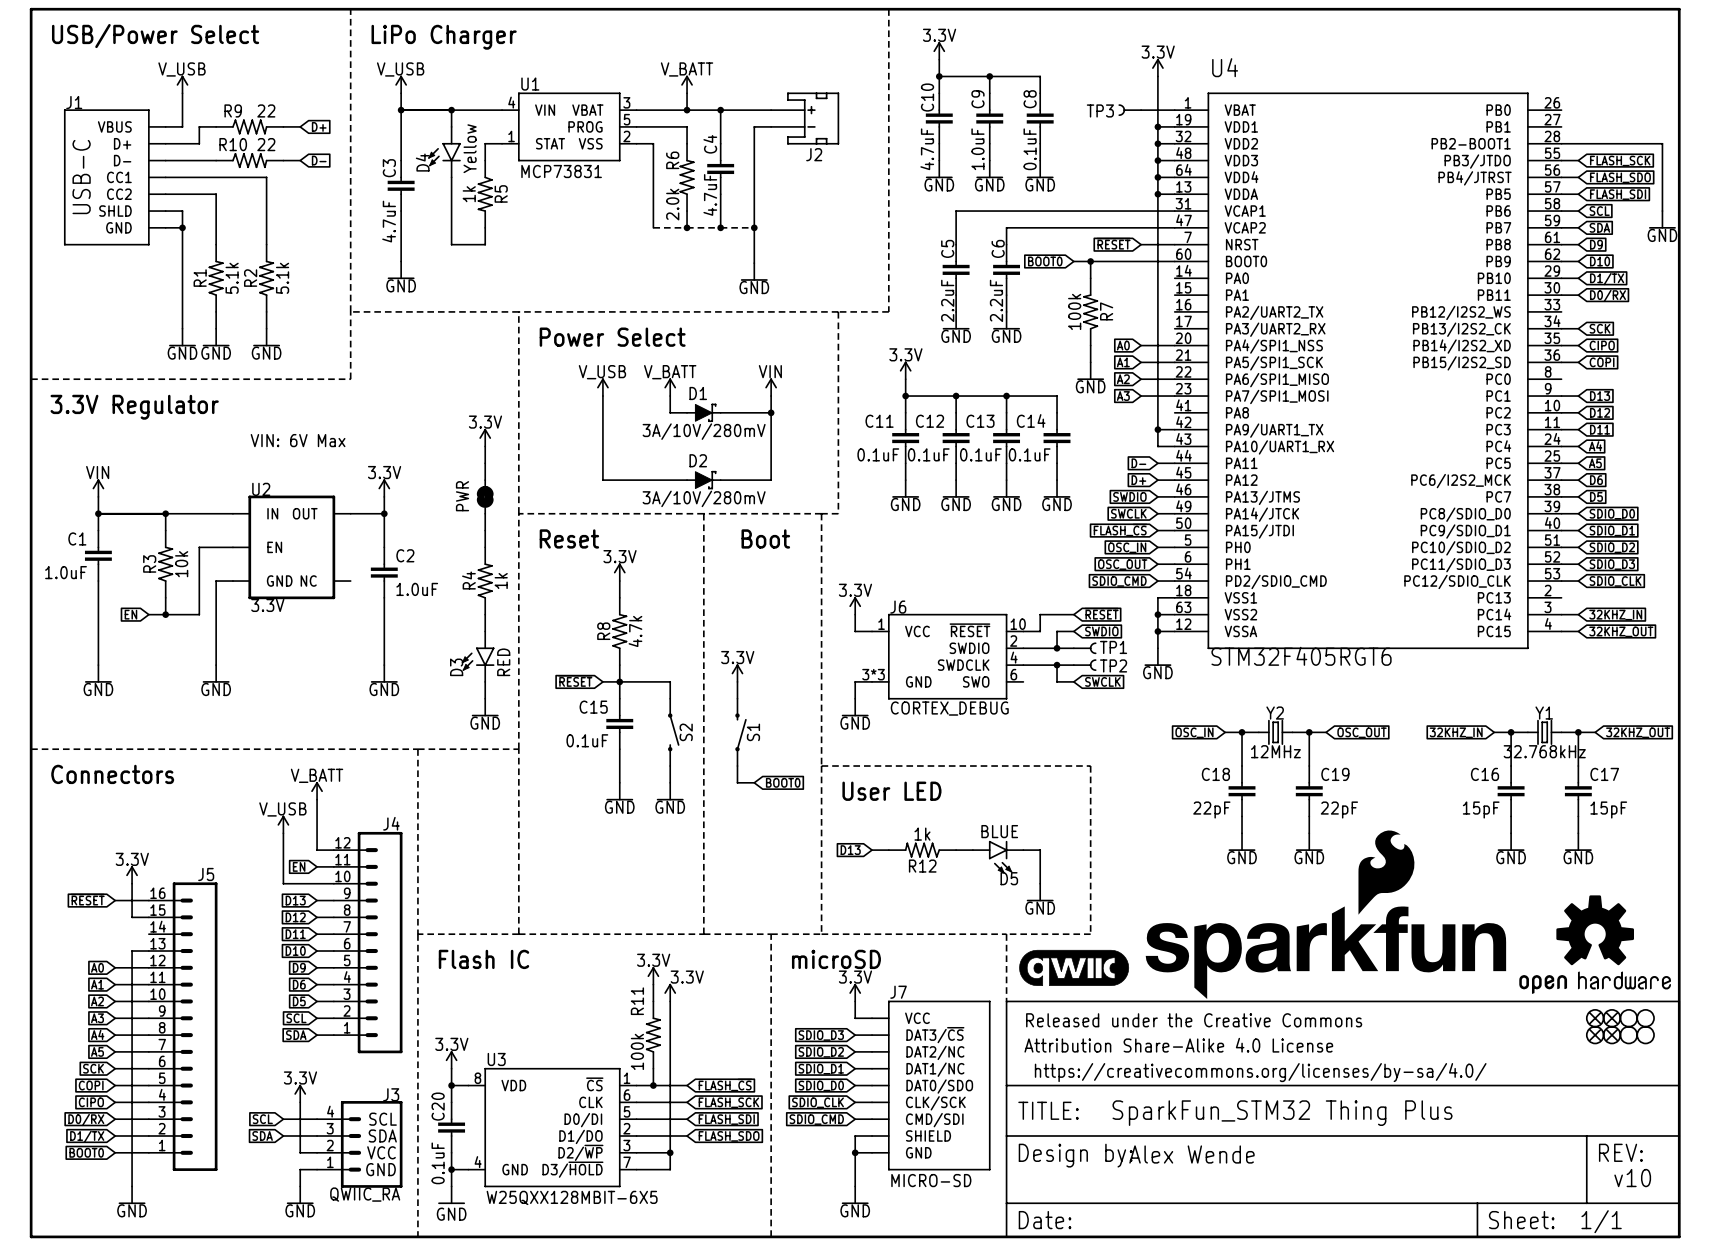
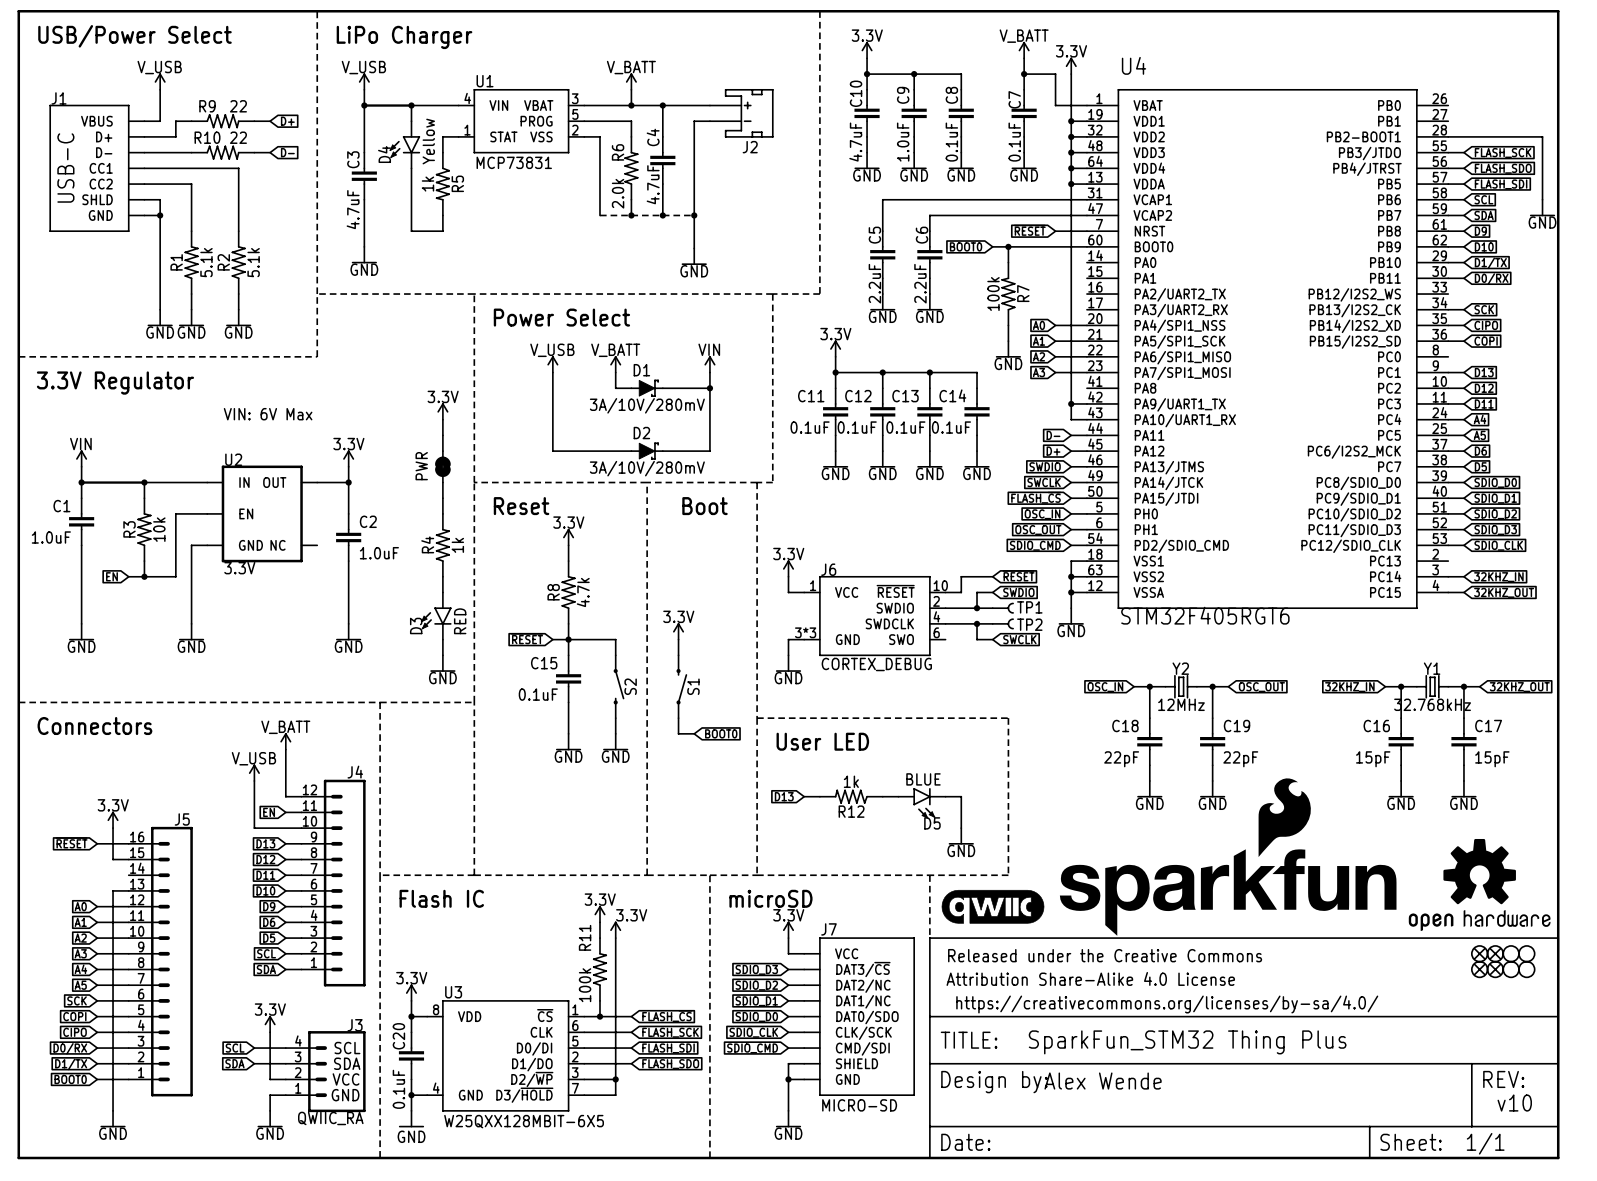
power symbol: none -> V_BATT (1024, 50)
wire: none -> (1024, 58) (1024, 89)
wire: none -> (1024, 74) (1055, 74) (1055, 105)
junction: none -> (1024, 74)
TP3: (1130, 110) -> none
C7: none -> 0.1uF (1024, 113)
wire: none -> (1024, 136) (1024, 152)
power symbol: none -> GND (1024, 160)

